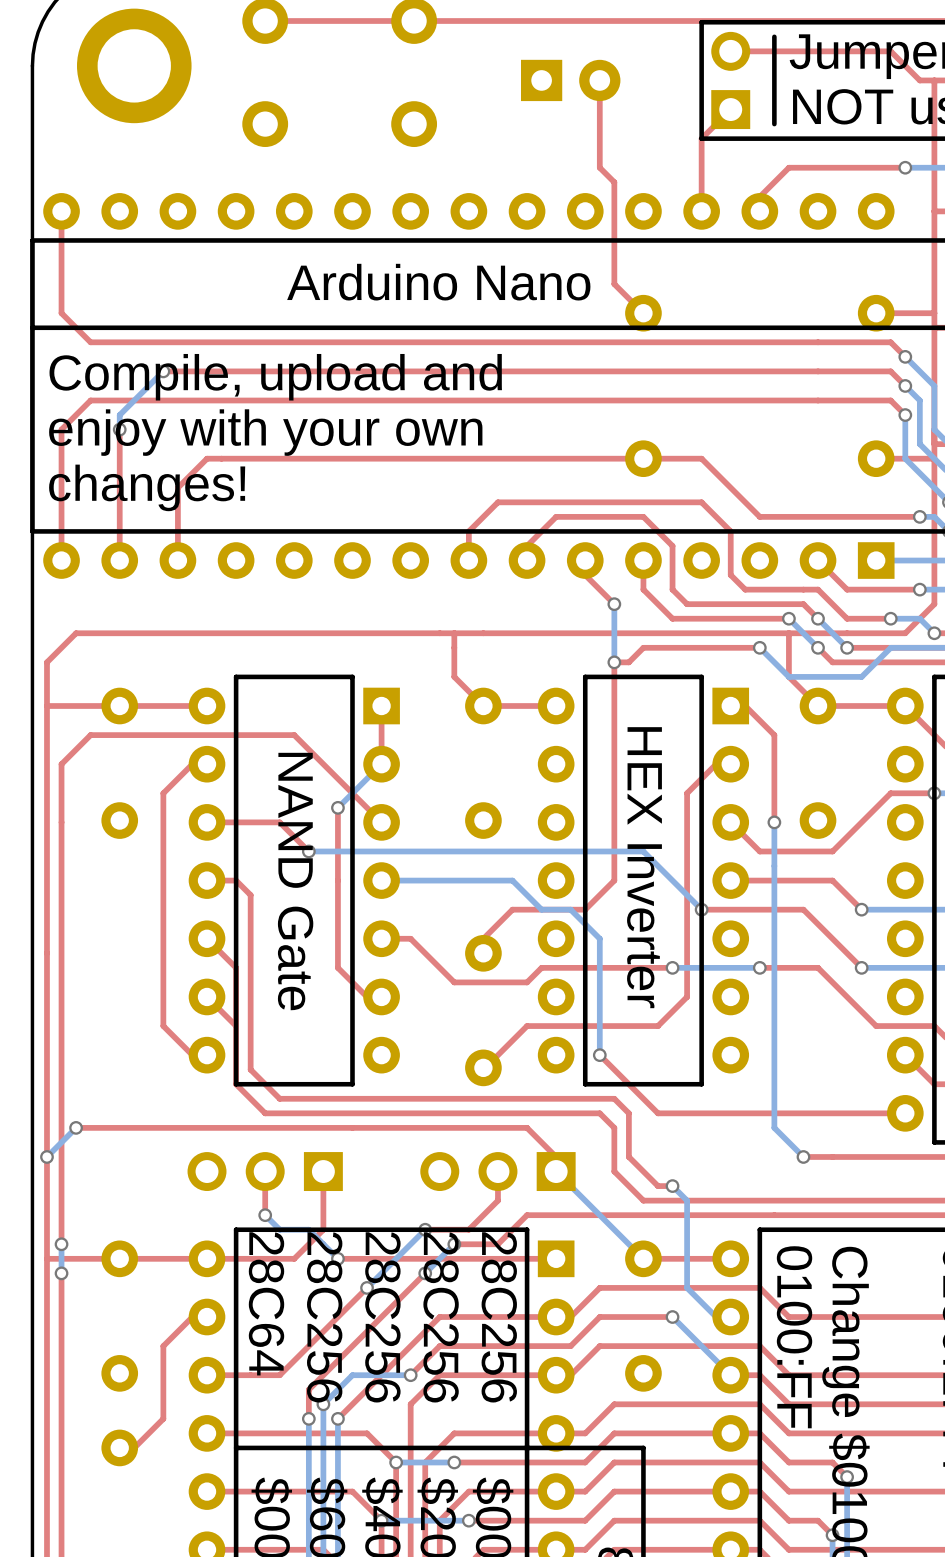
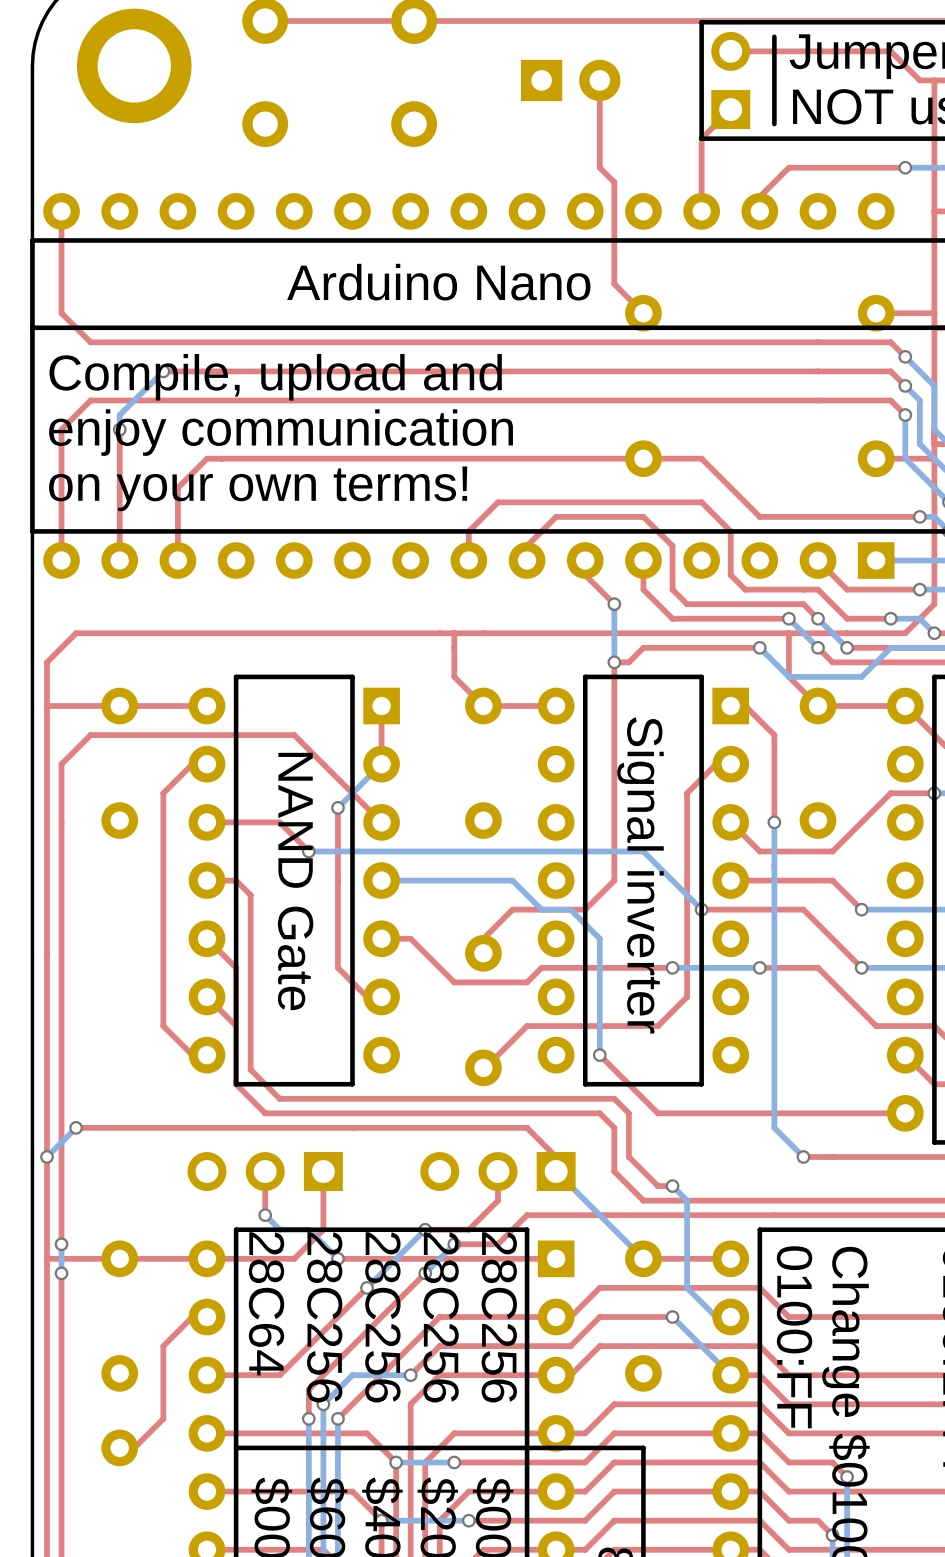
text: enjoy with your own (265, 432) -> enjoy communication (281, 432)
text: changes! (147, 487) -> on your own terms! (258, 488)
text: HEX Inverter (644, 867) -> Signal inverter (640, 875)

